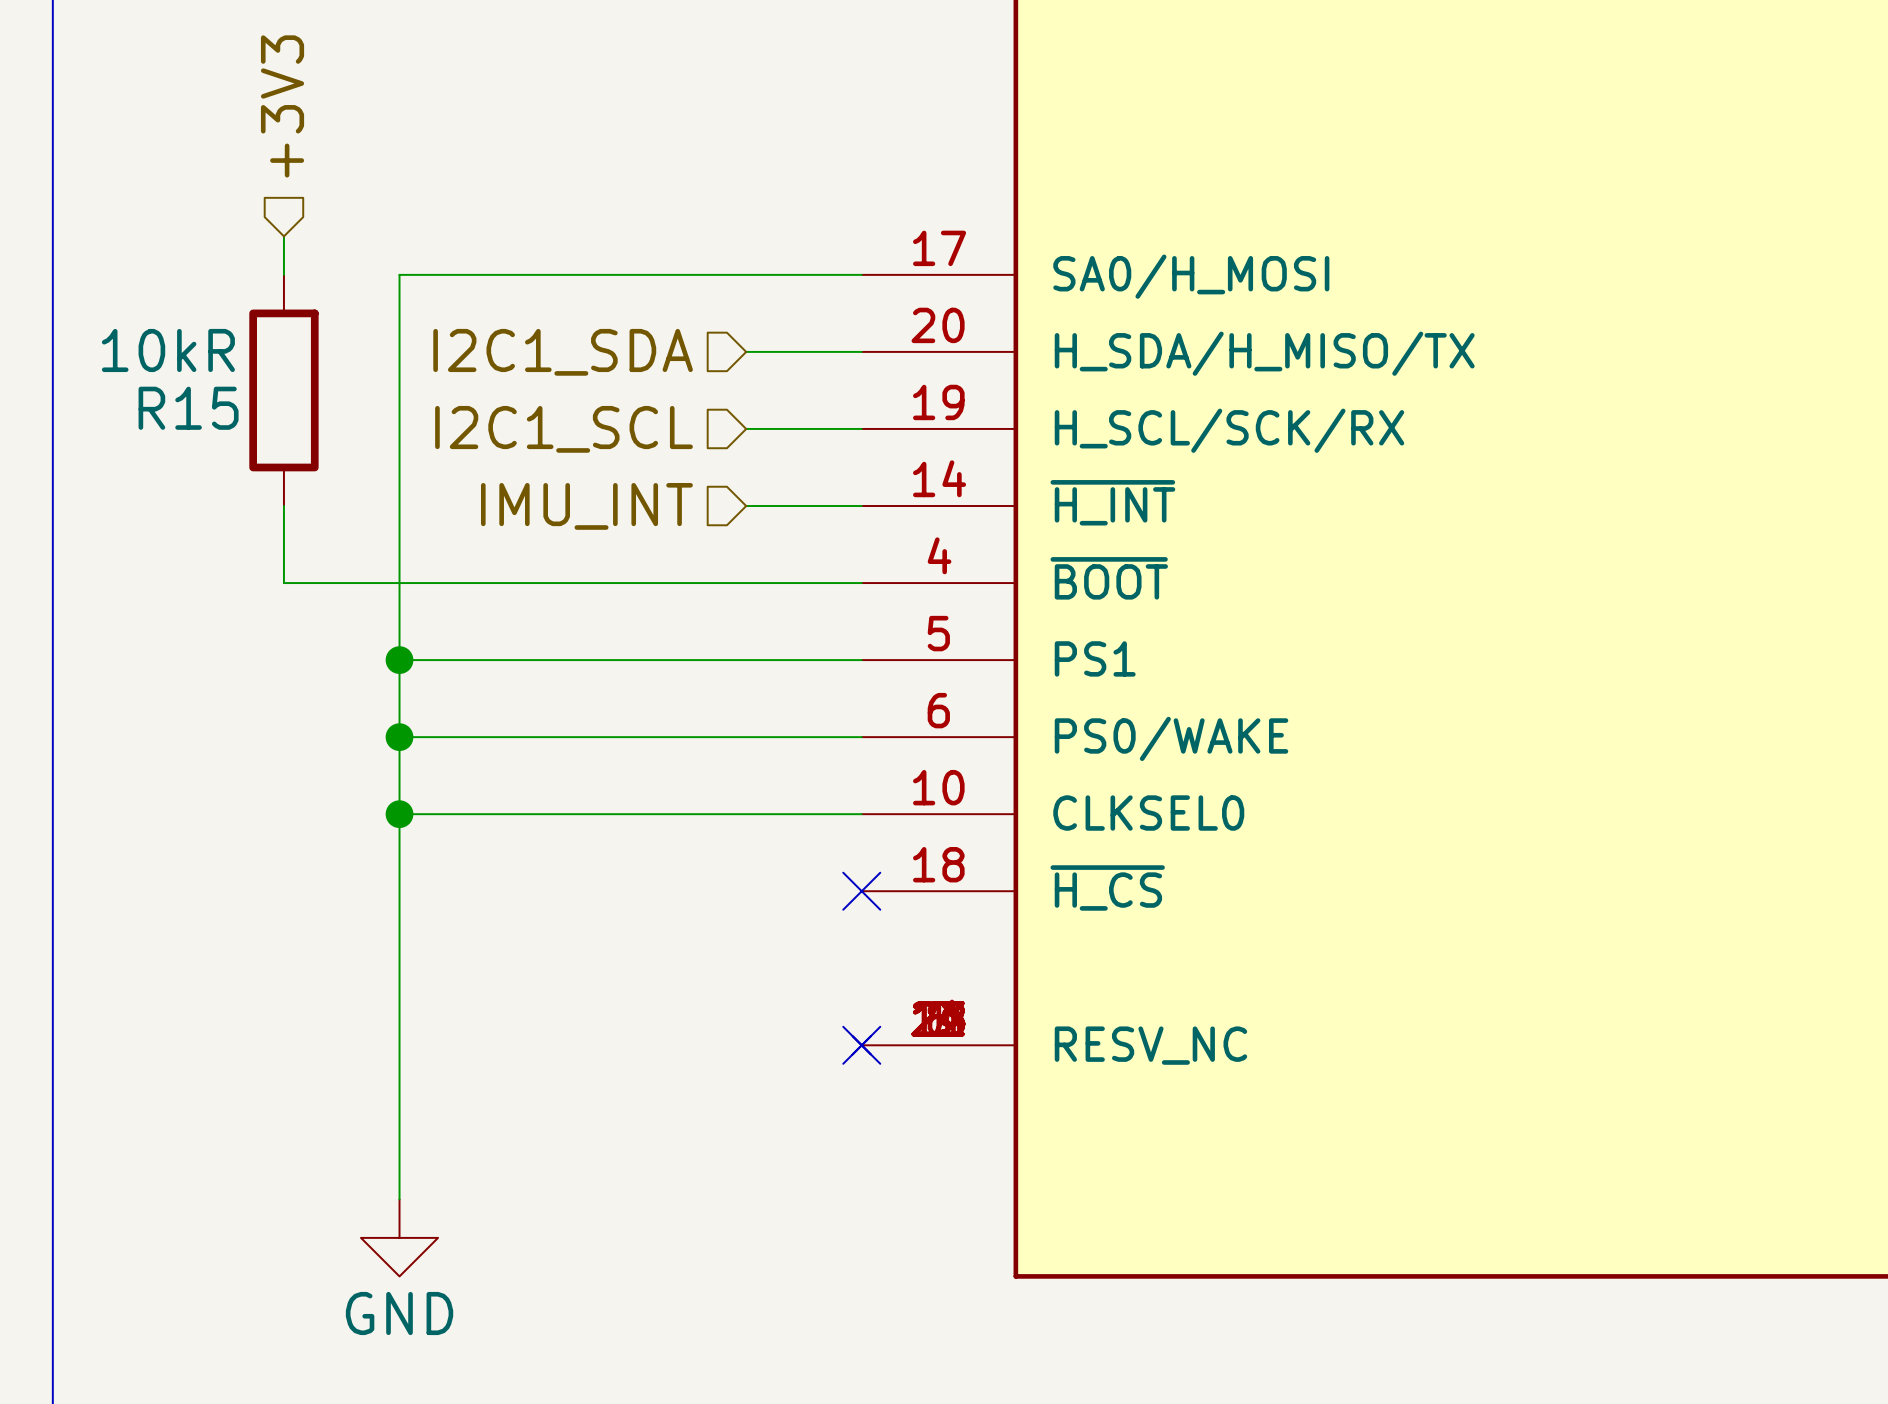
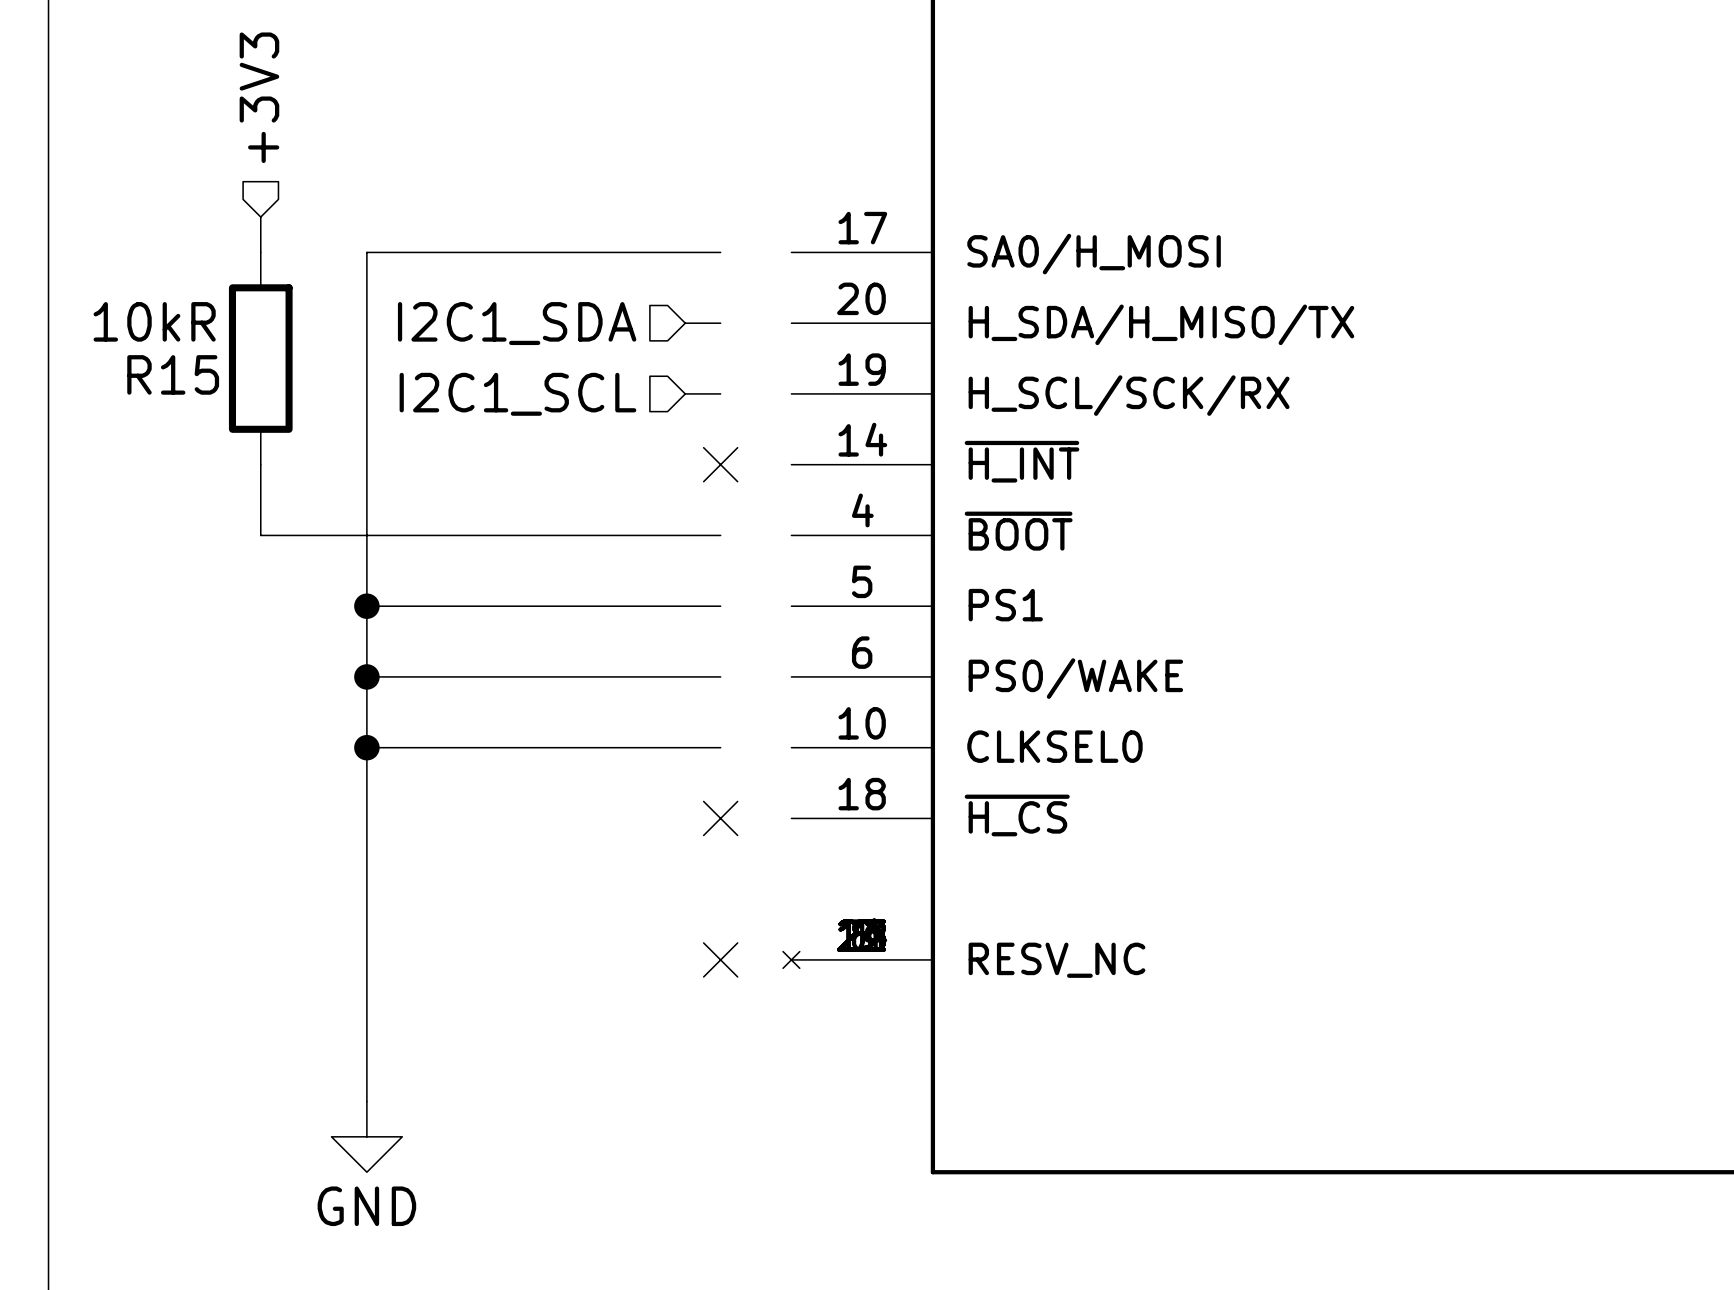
wire: (784, 274) (861, 274) -> none
wire: (784, 351) (861, 351) -> none
wire: (784, 428) (861, 428) -> none
hierarchical label: IMU_INT (586, 506) -> none
wire: (746, 506) (861, 506) -> none
no-connect mark: none -> (720, 464)
wire: (784, 583) (861, 583) -> none
wire: (784, 660) (861, 660) -> none
wire: (784, 737) (861, 737) -> none
wire: (784, 814) (861, 814) -> none
no-connect mark position: (861, 891) -> (720, 818)
no-connect mark position: (861, 1045) -> (720, 959)

